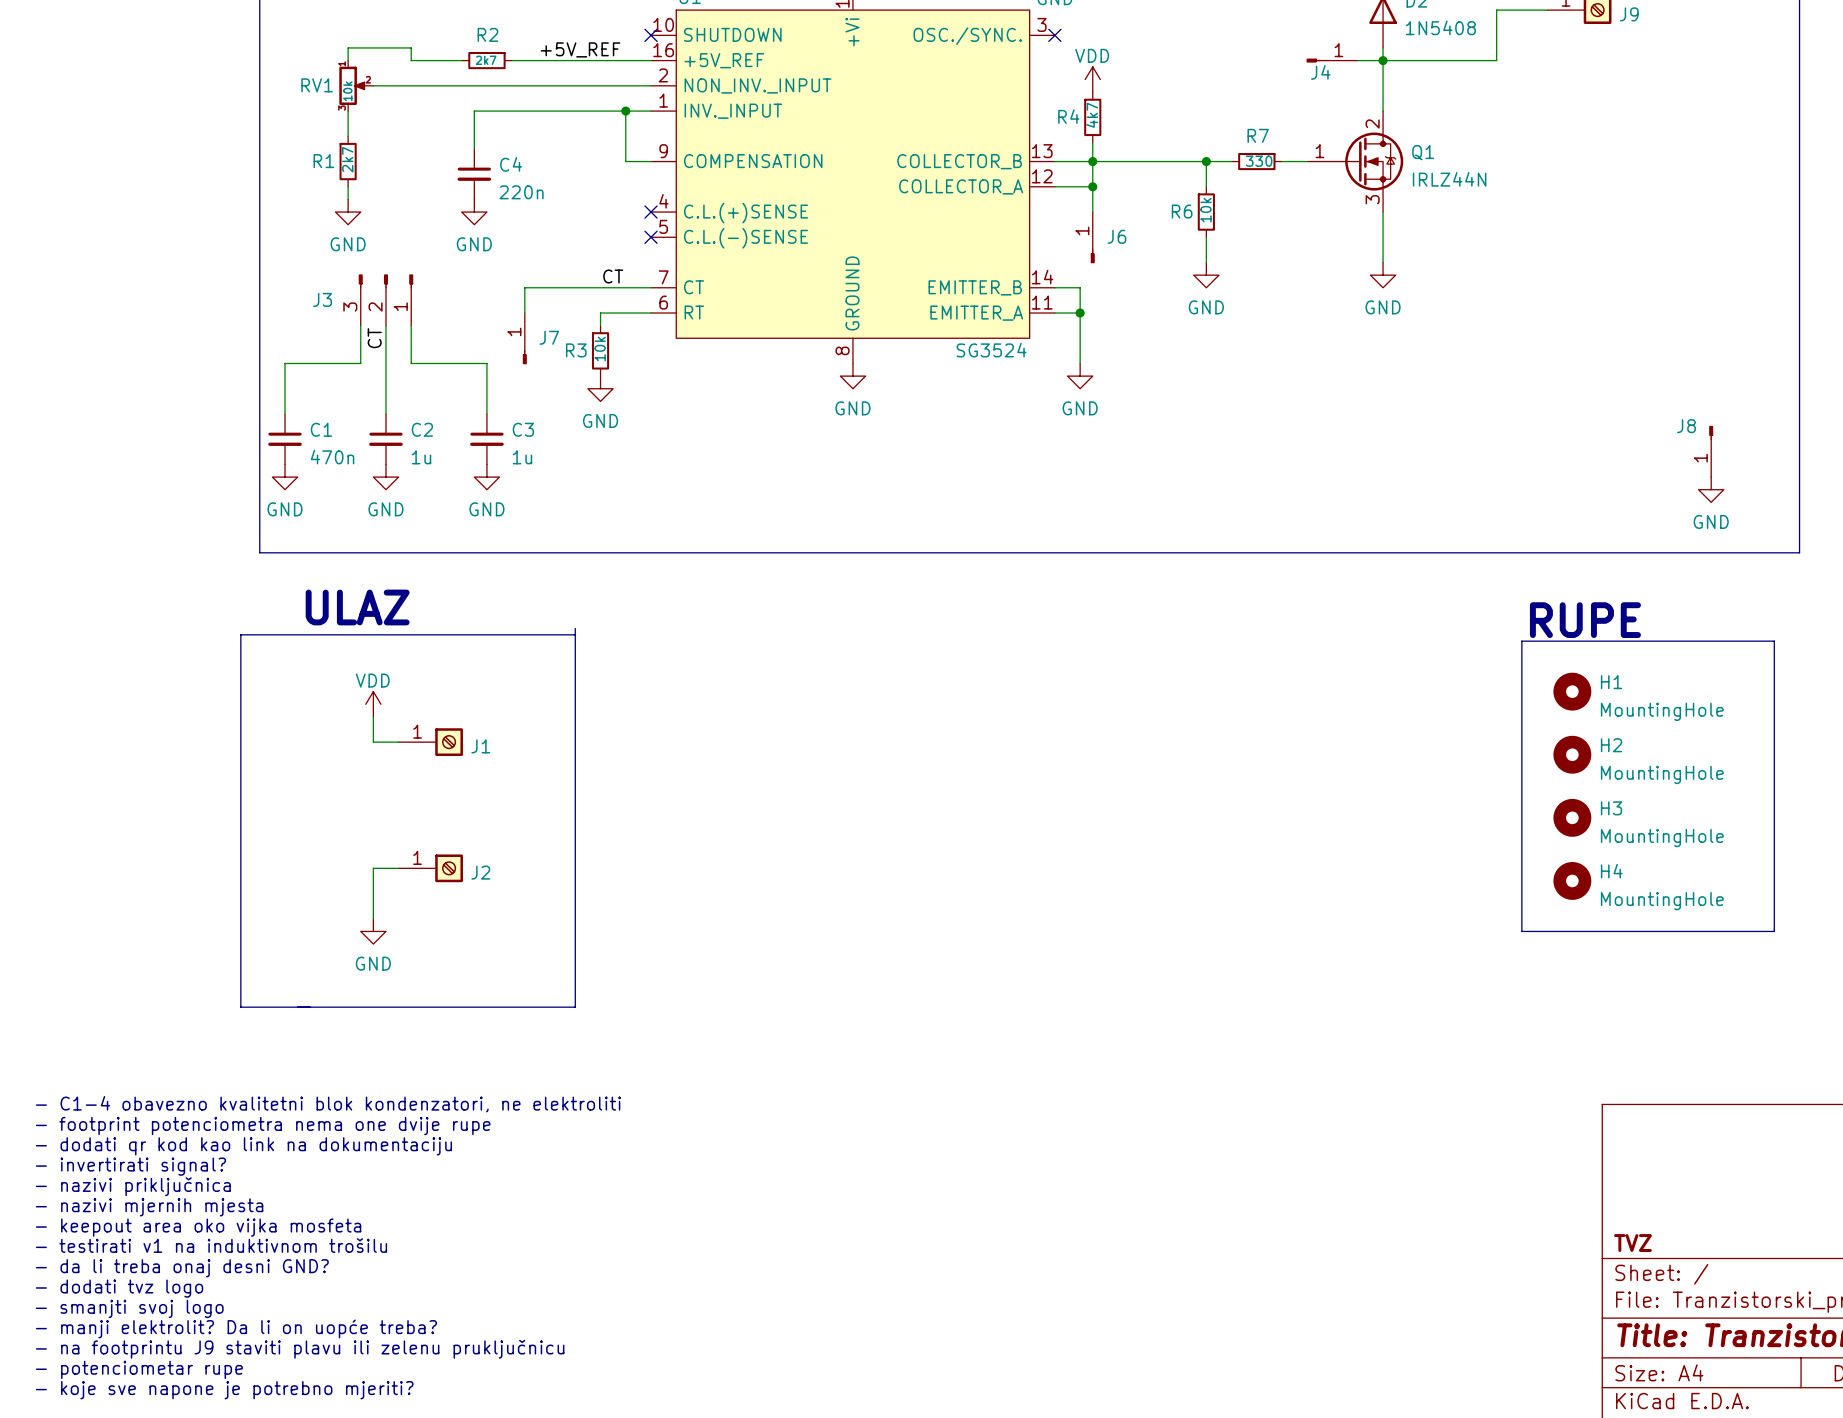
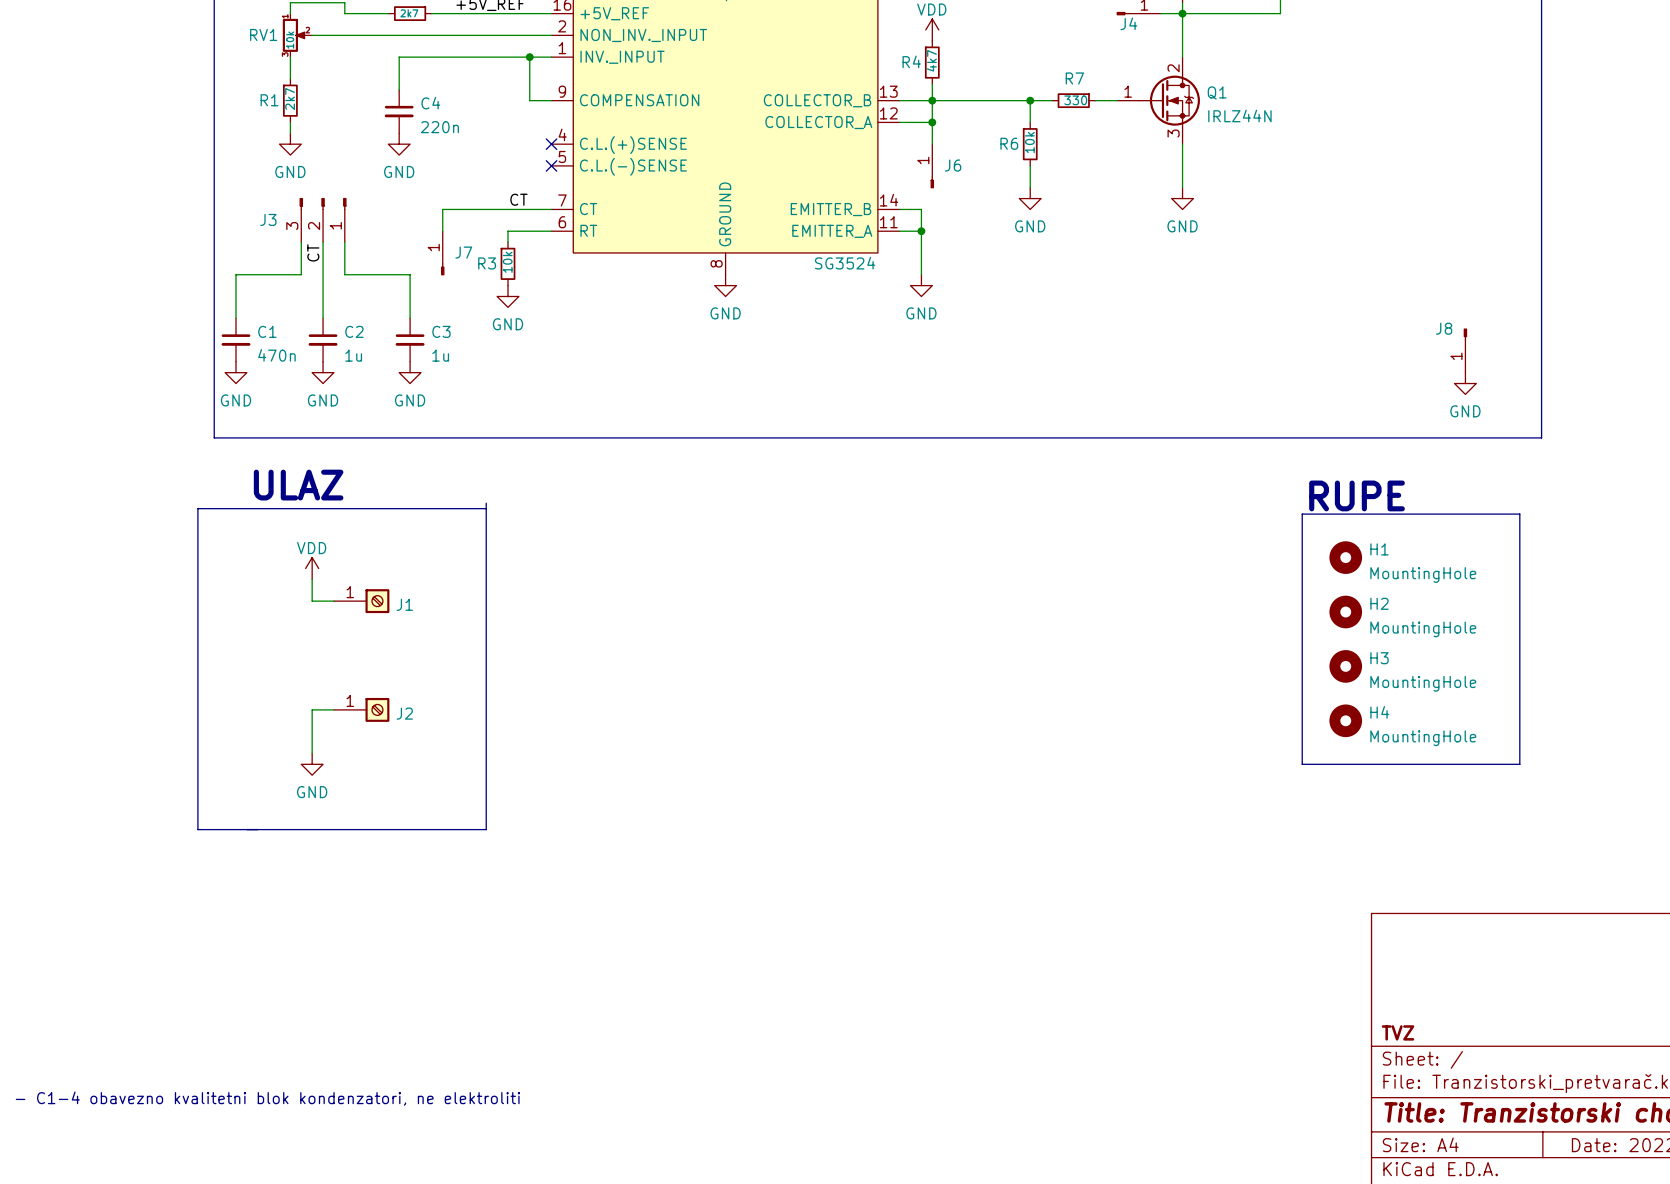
text position: - C1-4 obavezno kvalitetni blok kondenzatori, ne elektroliti (328, 1104) -> - C1-4 obavezno kvalitetni blok kondenzatori, ne elektroliti (267, 1098)
text: - footprint potenciometra nema one dvije rupe (263, 1126) -> none
text: - dodati qr kod kao link na dokumentaciju (243, 1146) -> none
text: - invertirati signal? (130, 1166) -> none
text: - nazivi priključnica (133, 1186) -> none
text: - nazivi mjernih mjesta (149, 1207) -> none
text: - keepout area oko vijka mosfeta (198, 1227) -> none
text: - testirati v1 na induktivnom trošilu (211, 1245) -> none
text: - da li treba onaj desni GND? (182, 1268) -> none
text: - dodati tvz logo (119, 1288) -> none
text: - smanjti svoj logo (129, 1308) -> none
text: - manji elektrolit? Da li on uopće treba? (236, 1328) -> none
text: - na footprintu J9 staviti plavu ili zelenu pruključnicu (300, 1349) -> none
text: - potenciometar rupe (139, 1369) -> none
text: - koje sve napone je potrebno mjeriti? (224, 1390) -> none

